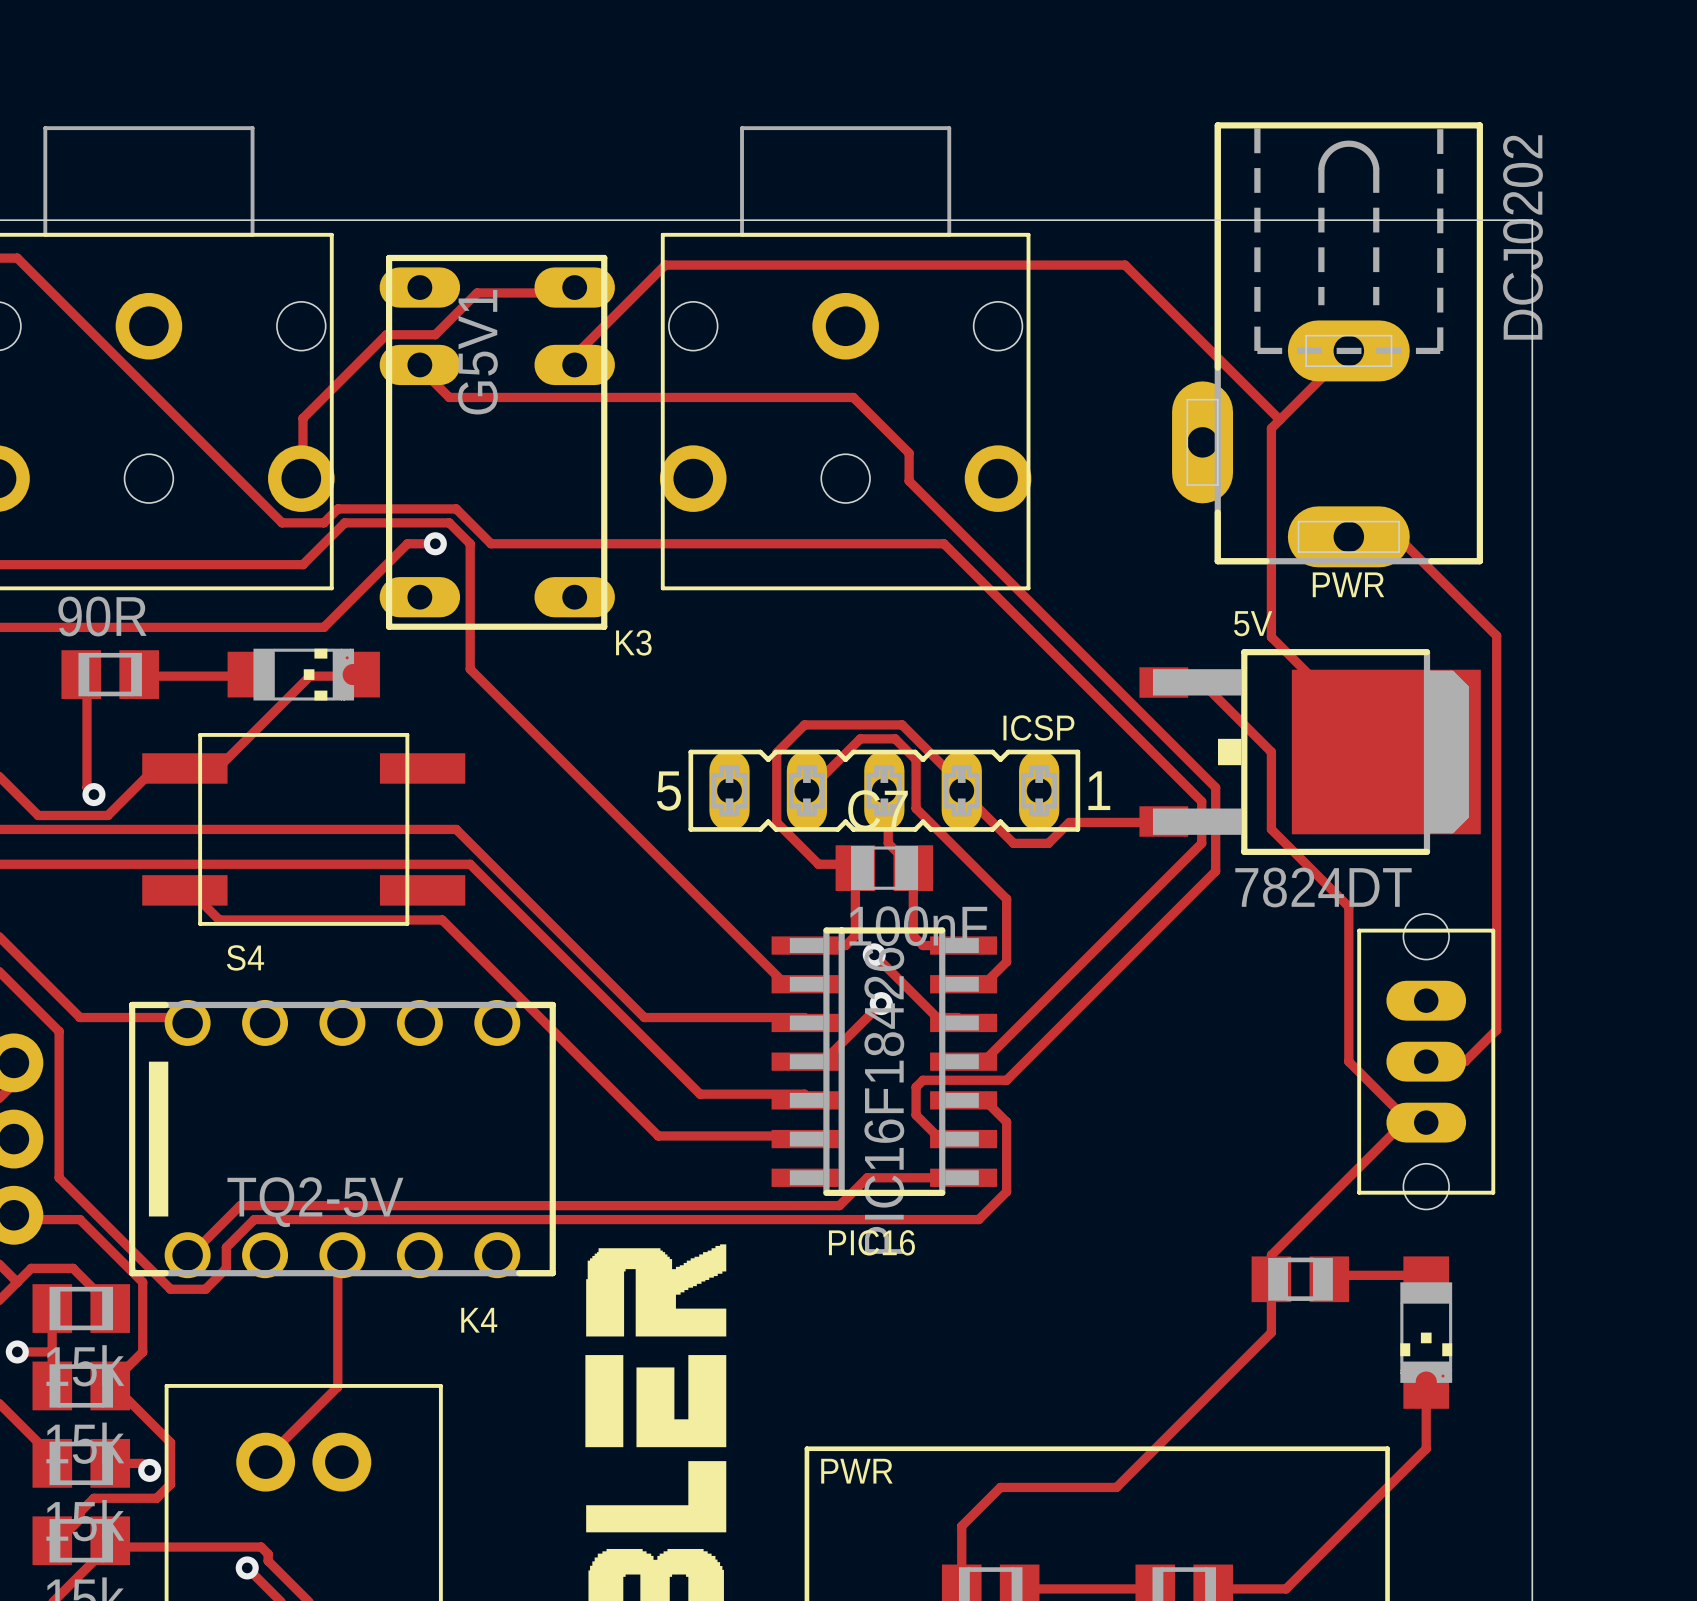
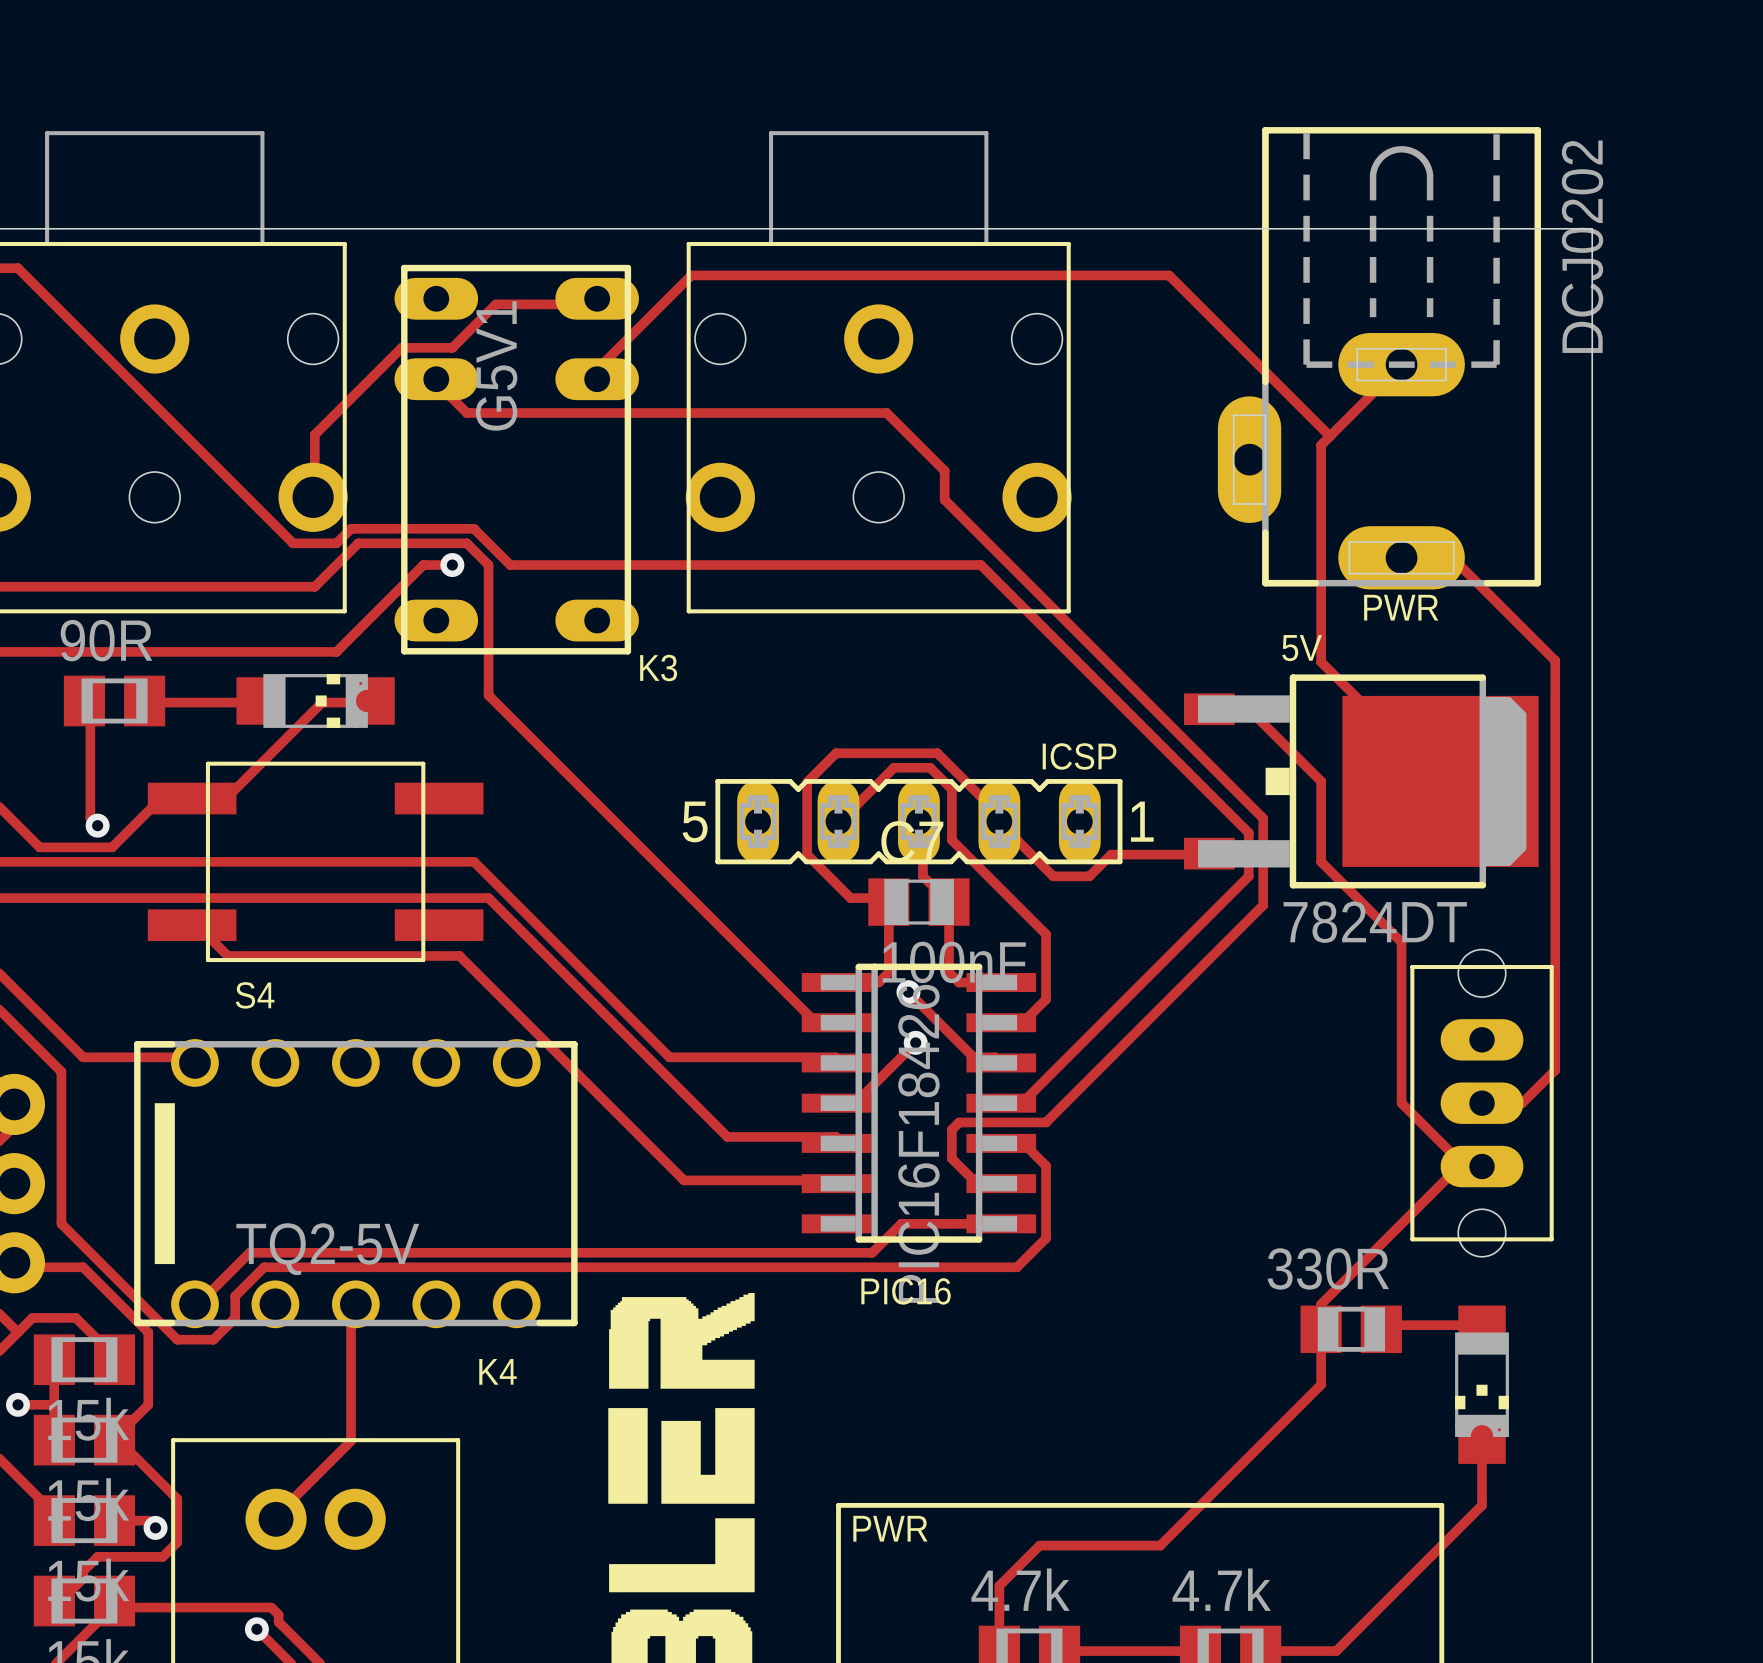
part value: none -> 330R (1328, 1268)
part value: none -> 4.7k (1020, 1589)
part value: none -> 4.7k (1221, 1589)

